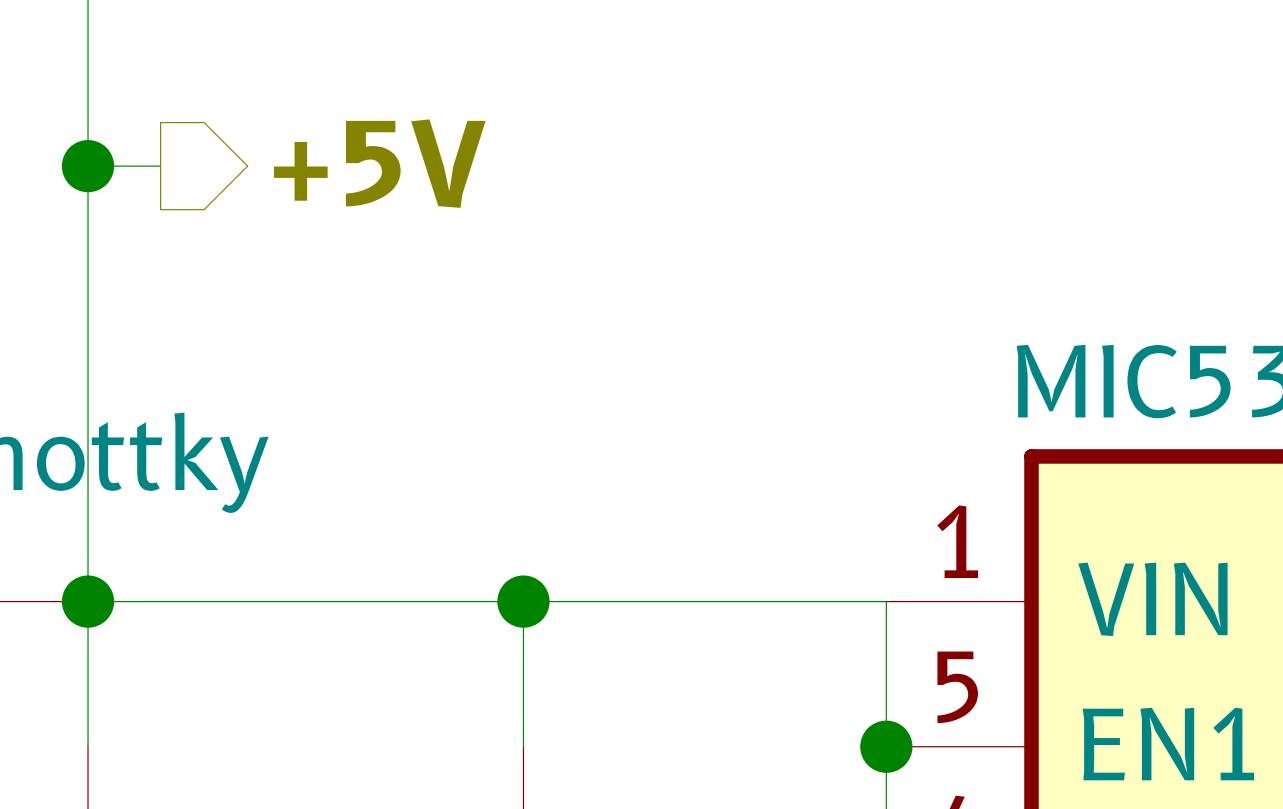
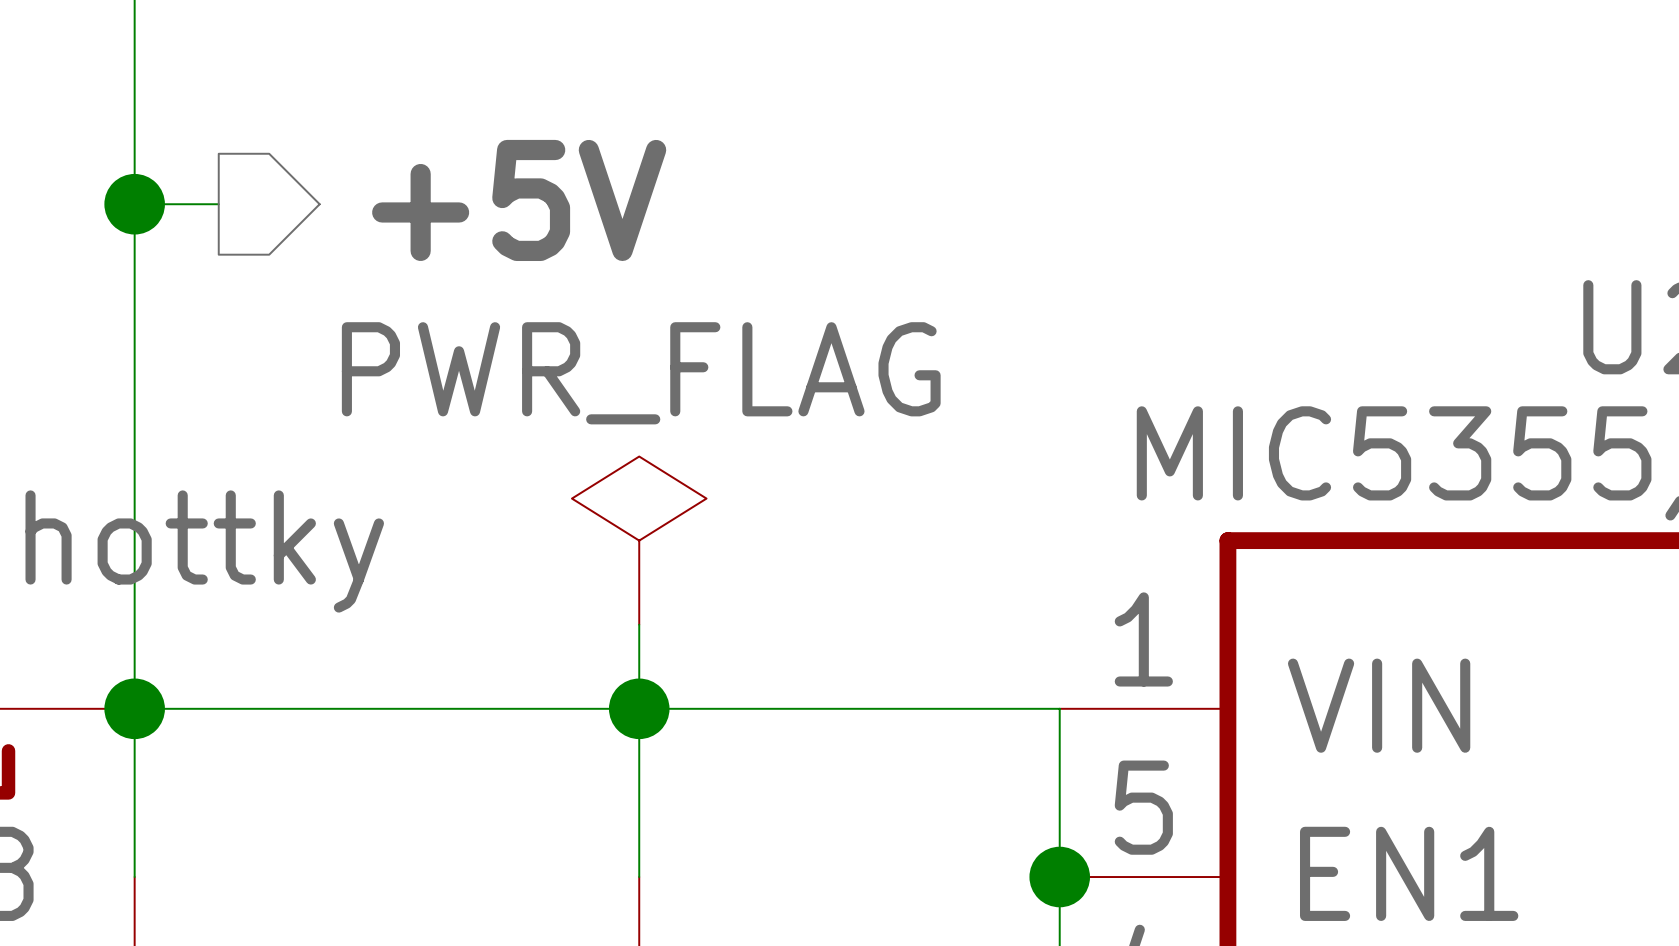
power symbol: none -> PWR_FLAG (639, 540)
wire: none -> (639, 624) (639, 708)

